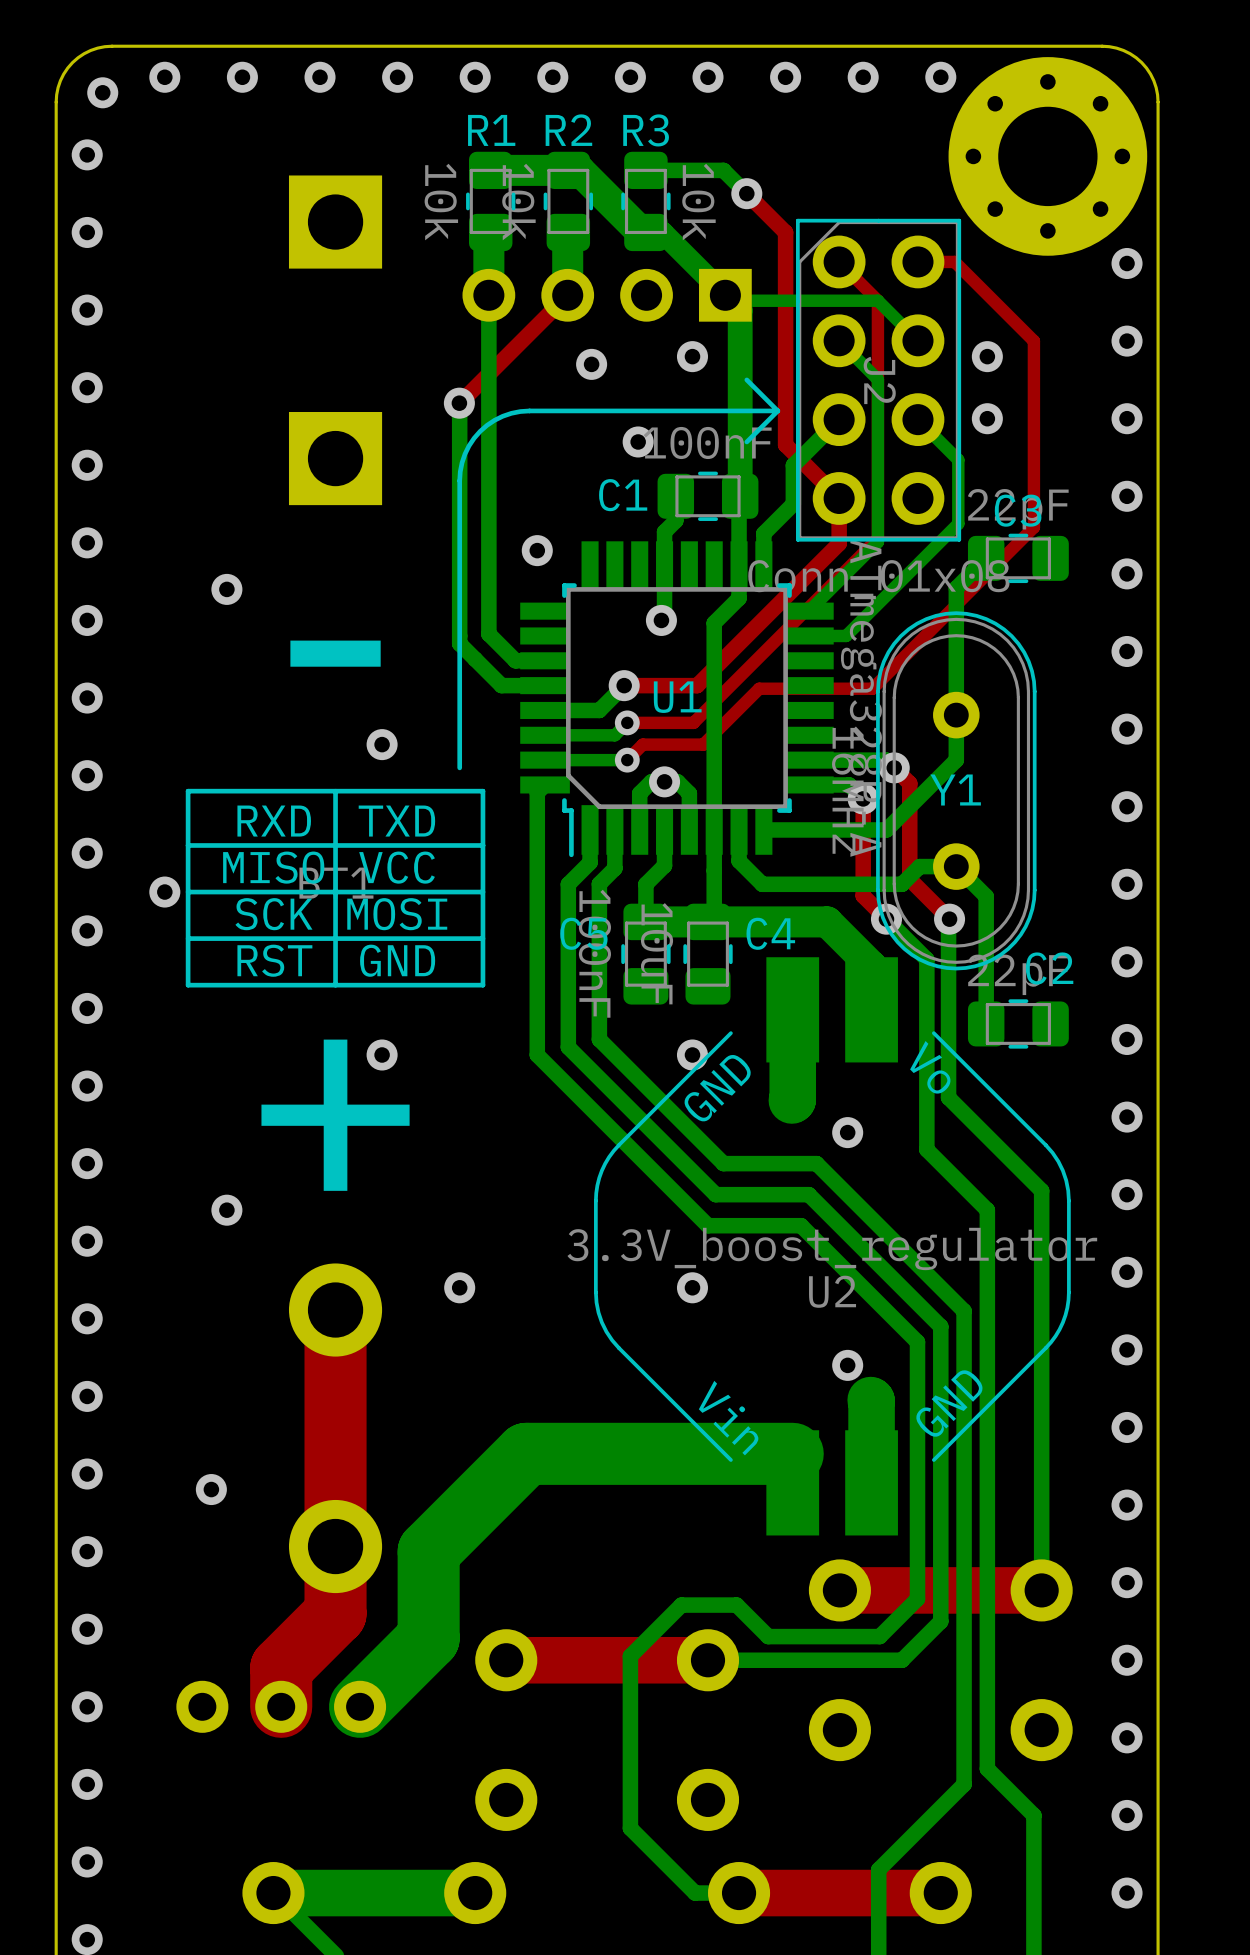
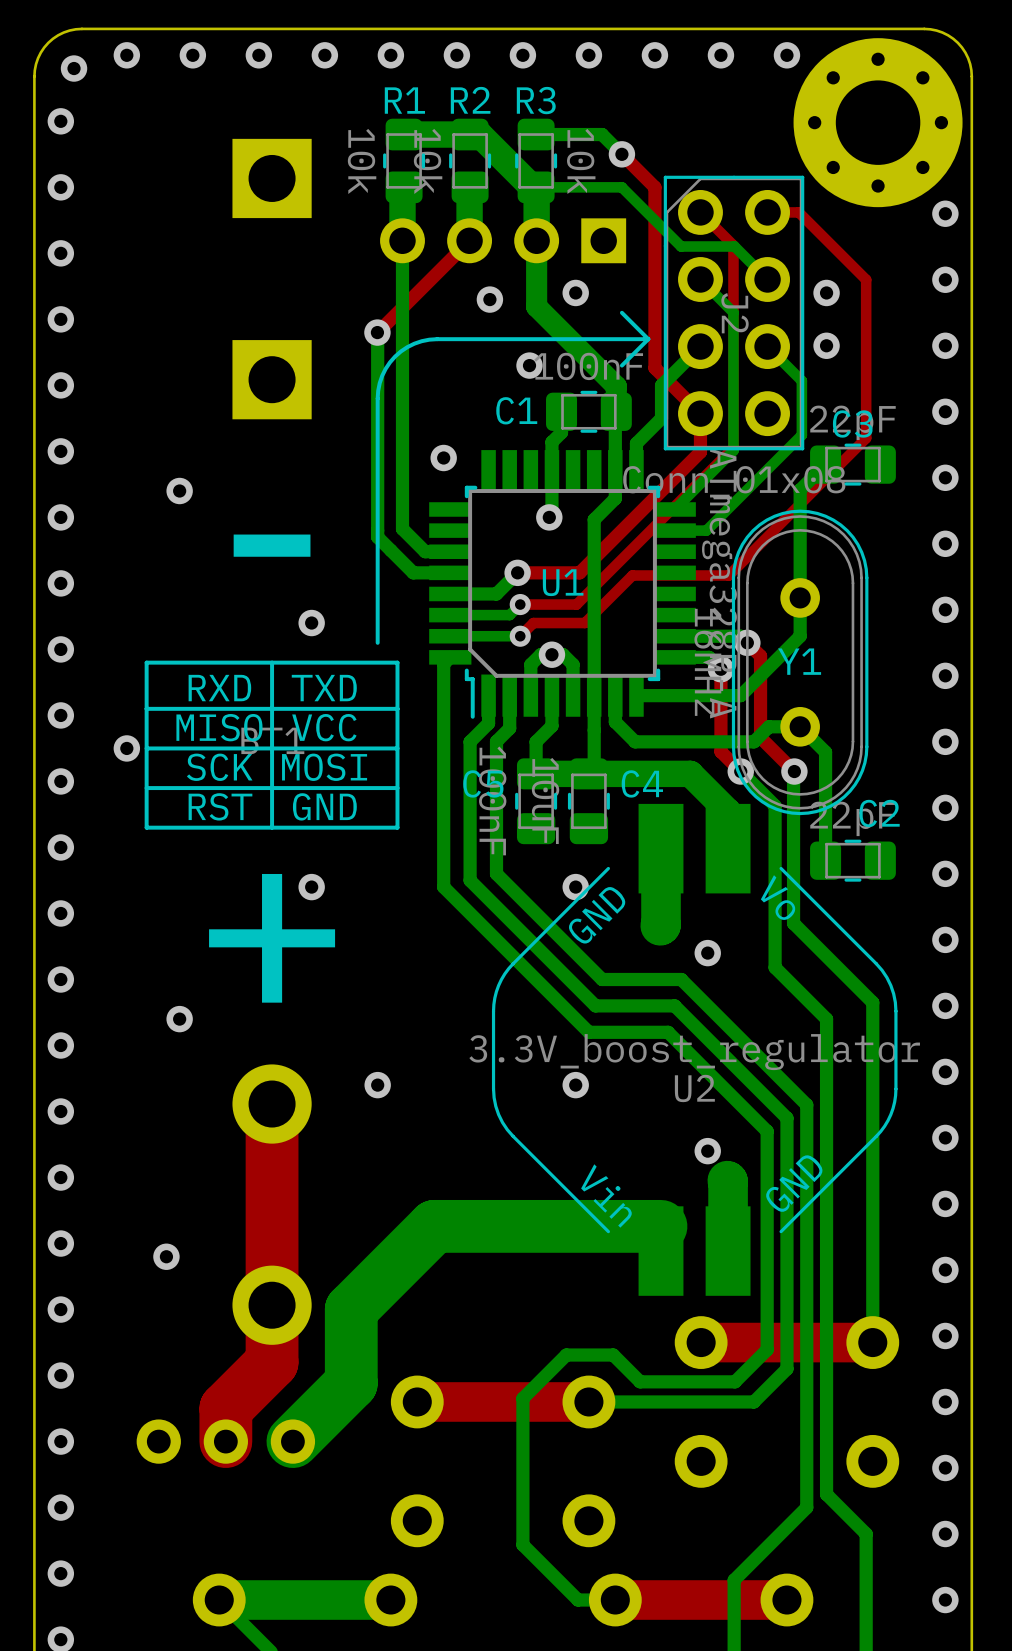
bottom track: (662, 232) (725, 295) -> none
bottom track: (725, 295) (730, 300) (879, 302) -> (550, 187) (621, 187) (681, 246) (734, 246)
bottom track: (725, 295) (740, 310) (740, 466) -> (536, 187) (536, 306) (616, 386)

